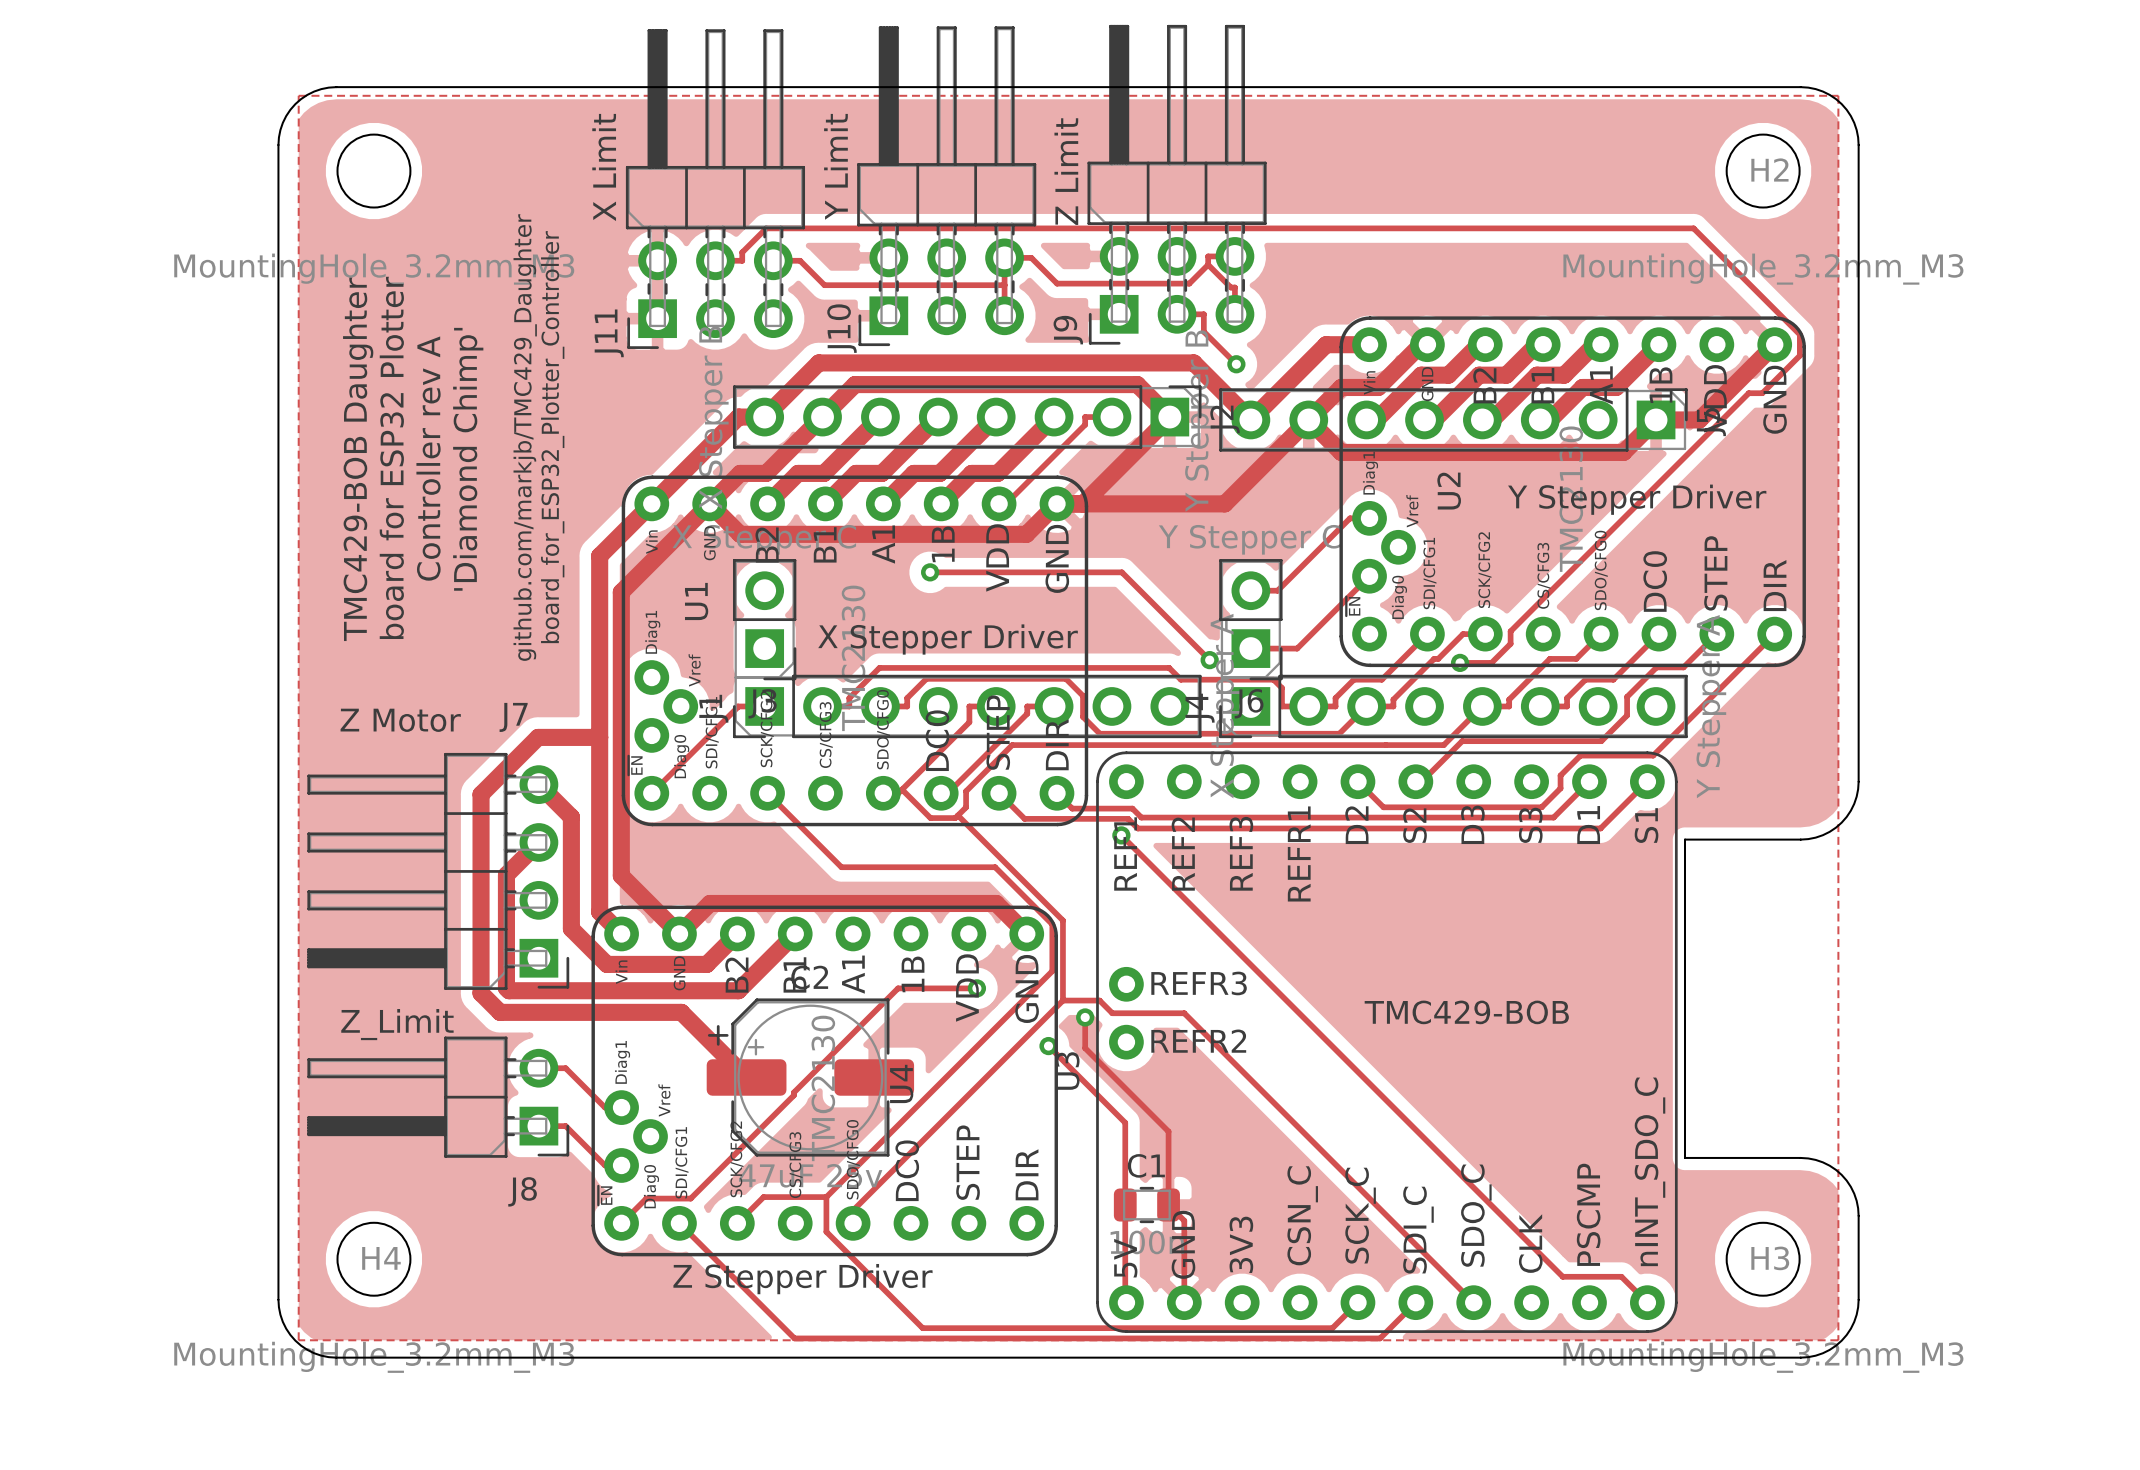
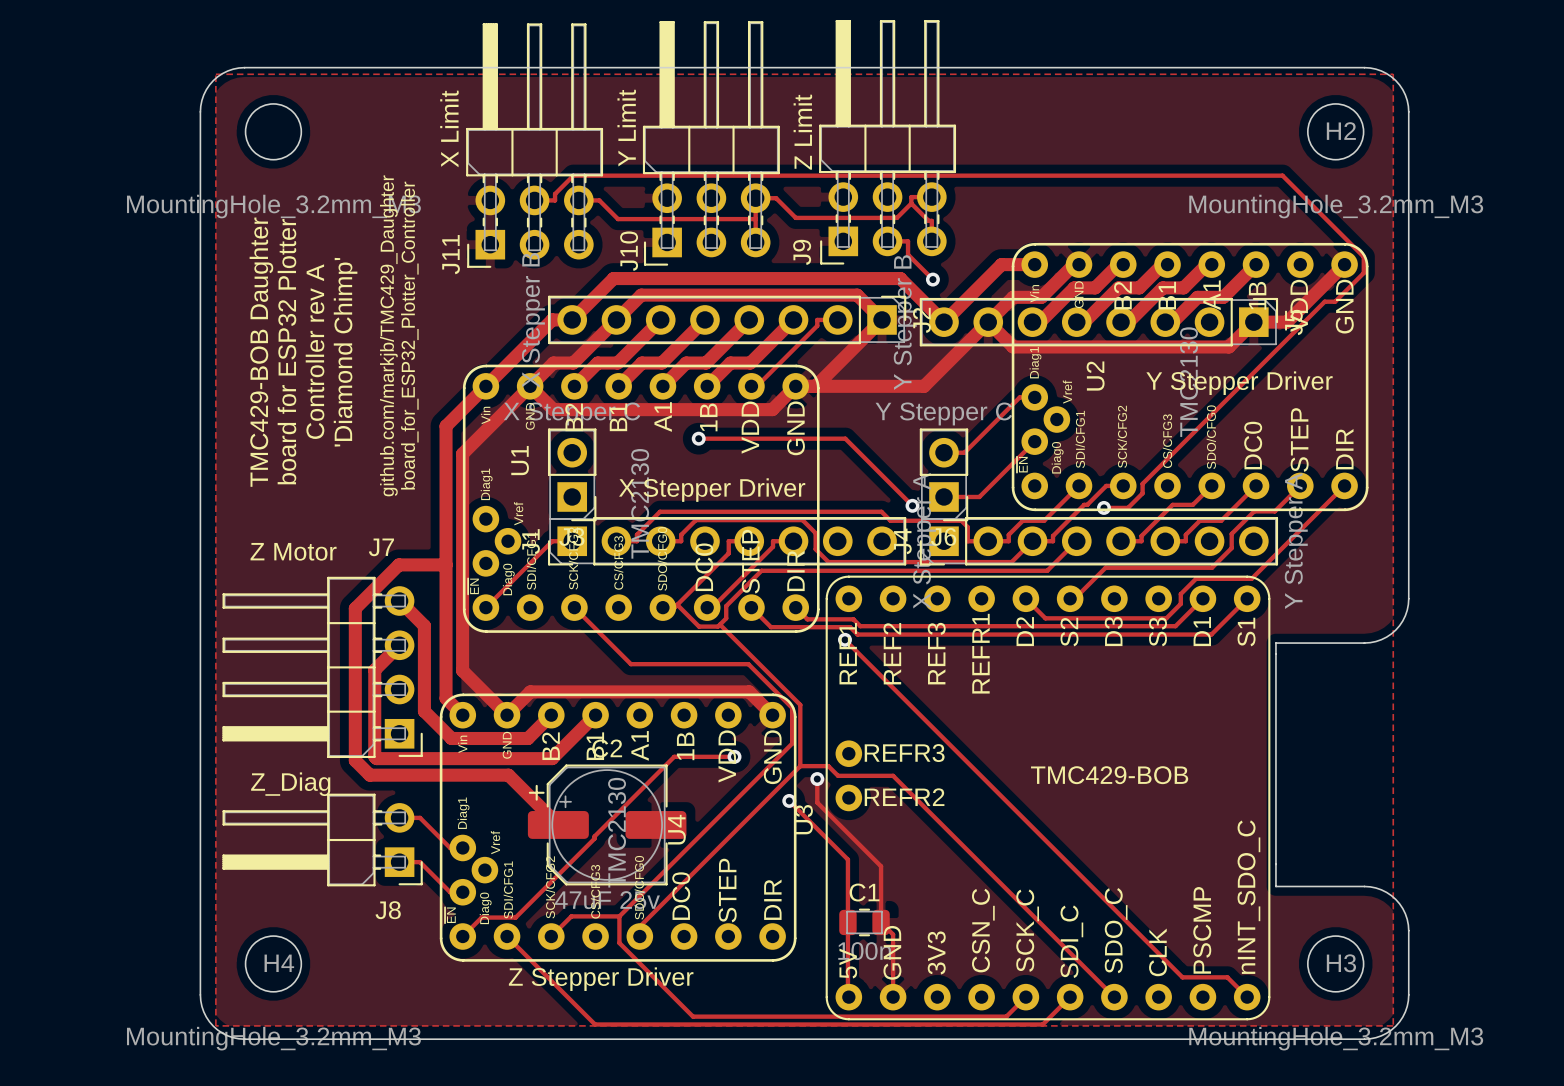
track: (1482, 706) (1443, 745) (1385, 745) -> (1076, 541) (1047, 570)
J8 value: Z_Limit (397, 1024) -> Z_Diag (290, 784)

